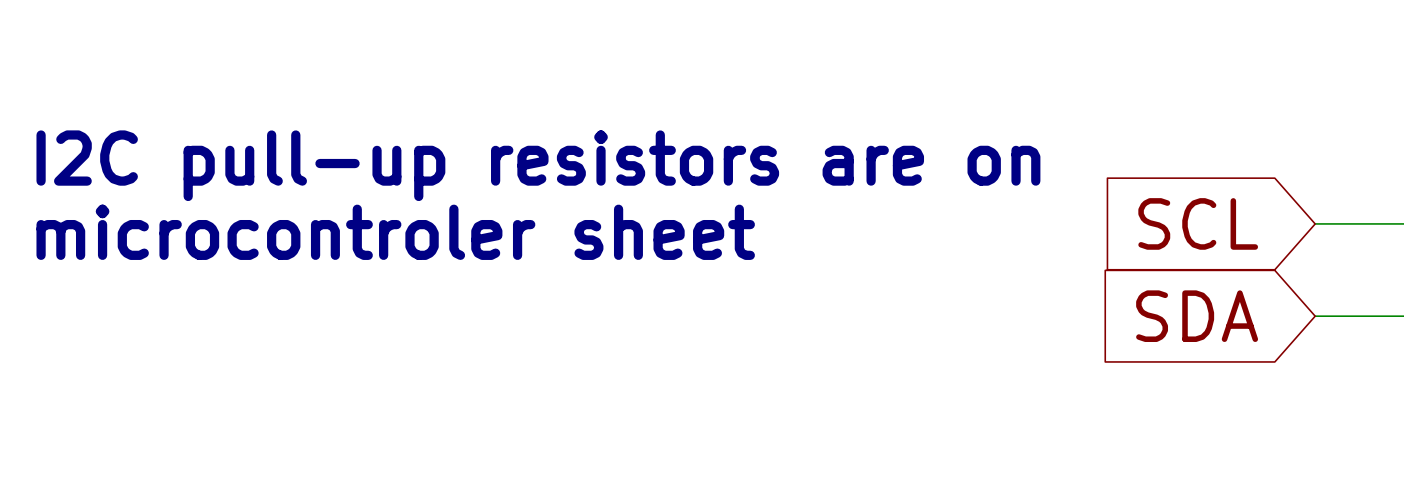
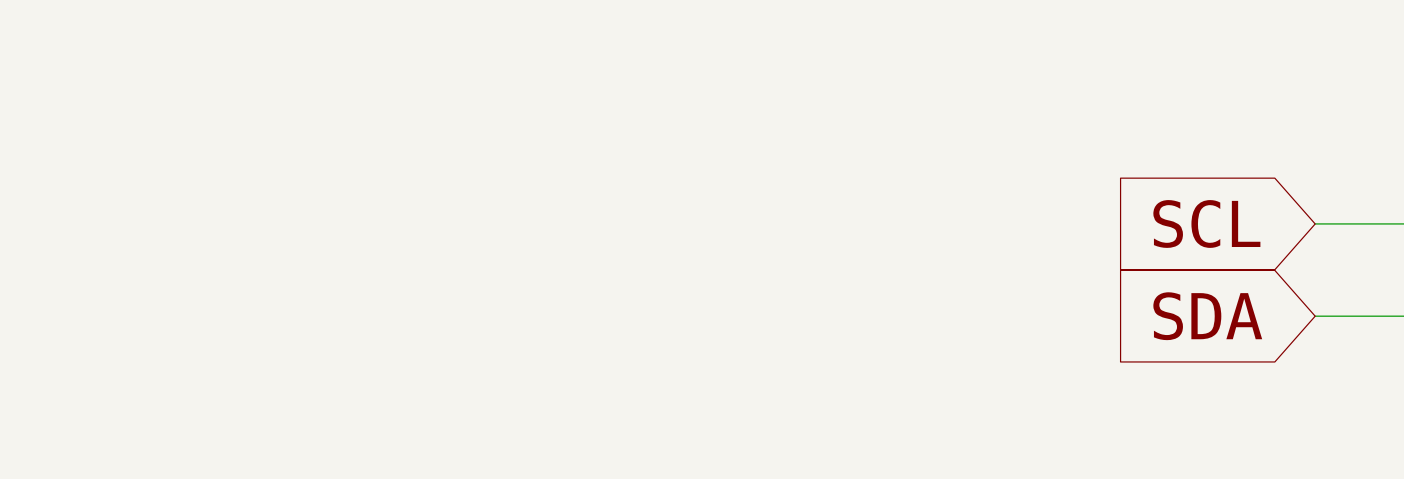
text: I2C pull-up resistors are on (538, 165) -> none
text: microcontroler sheet (395, 232) -> none

